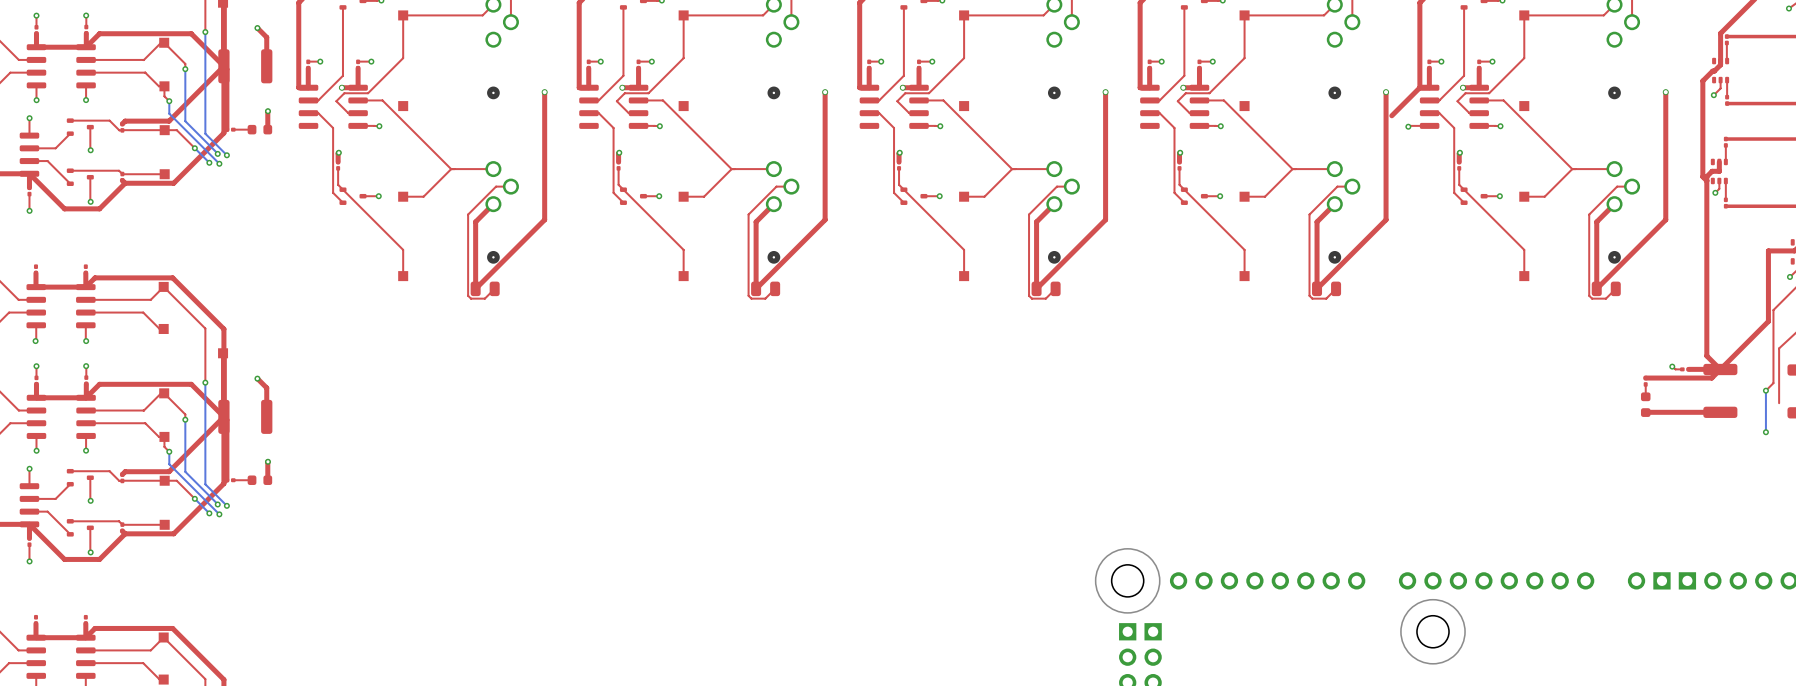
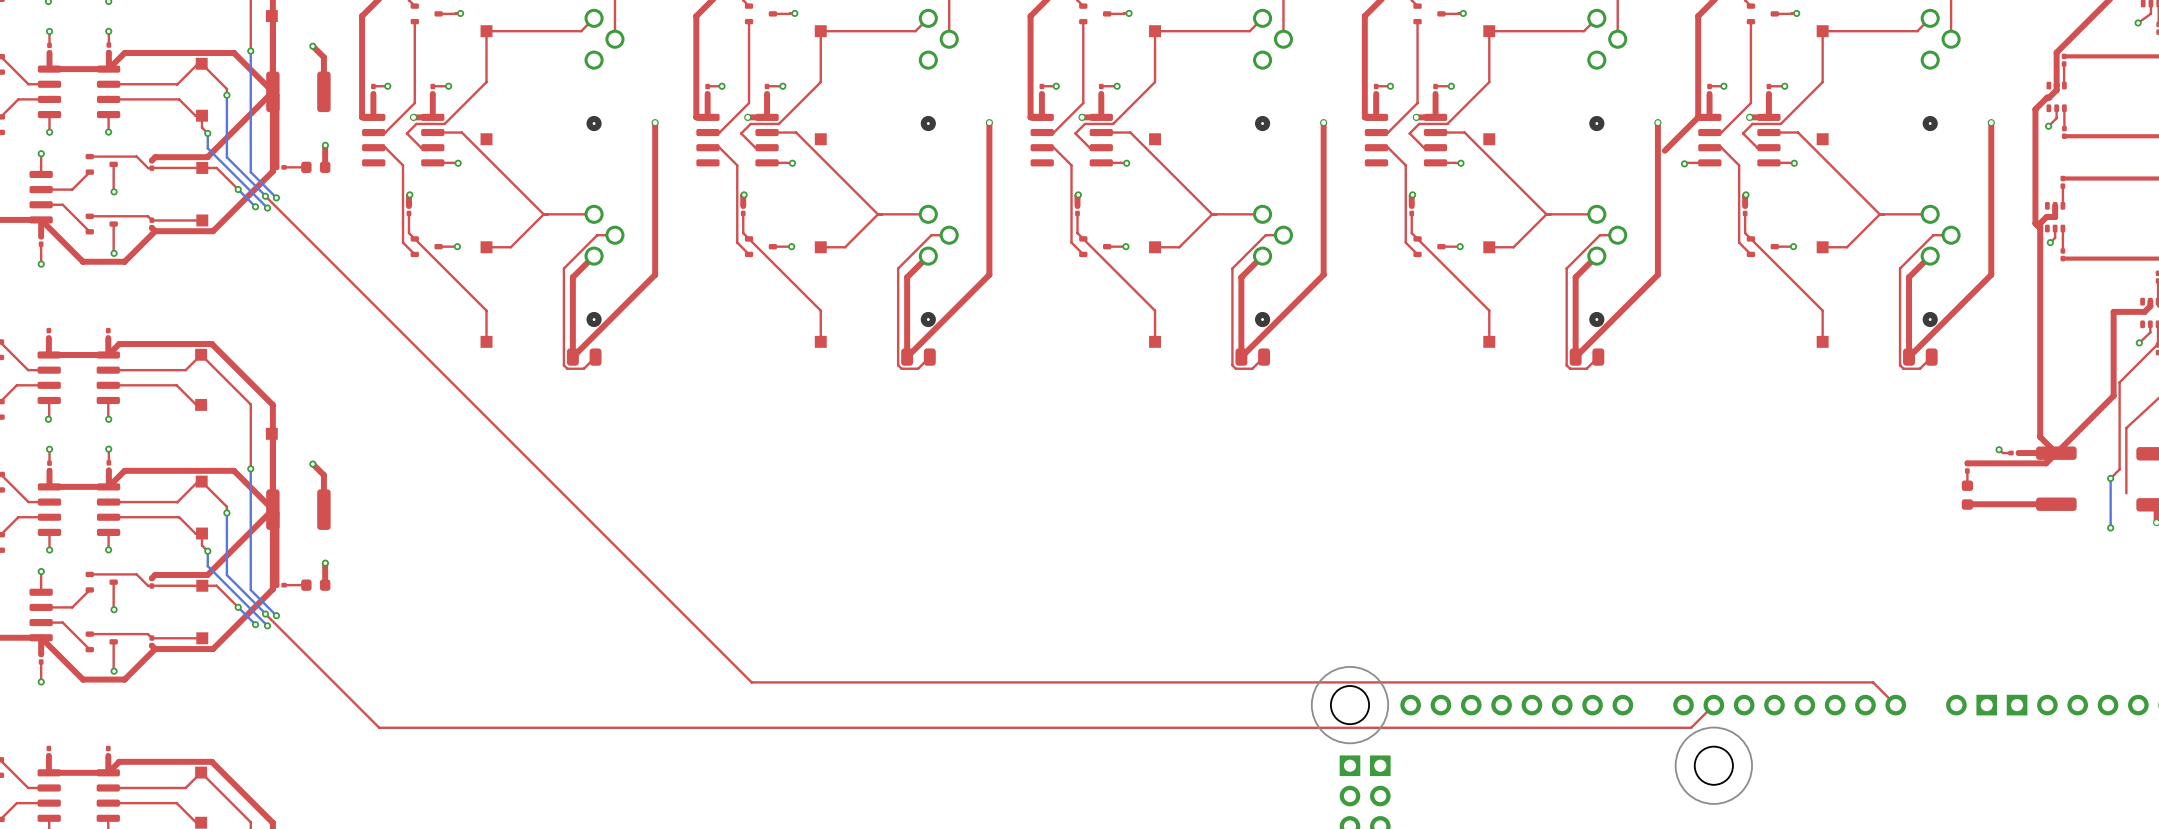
top track: none -> (265, 196) (751, 682) (1873, 682) (1895, 705)
top track: none -> (265, 614) (379, 727) (1691, 727) (1713, 705)

